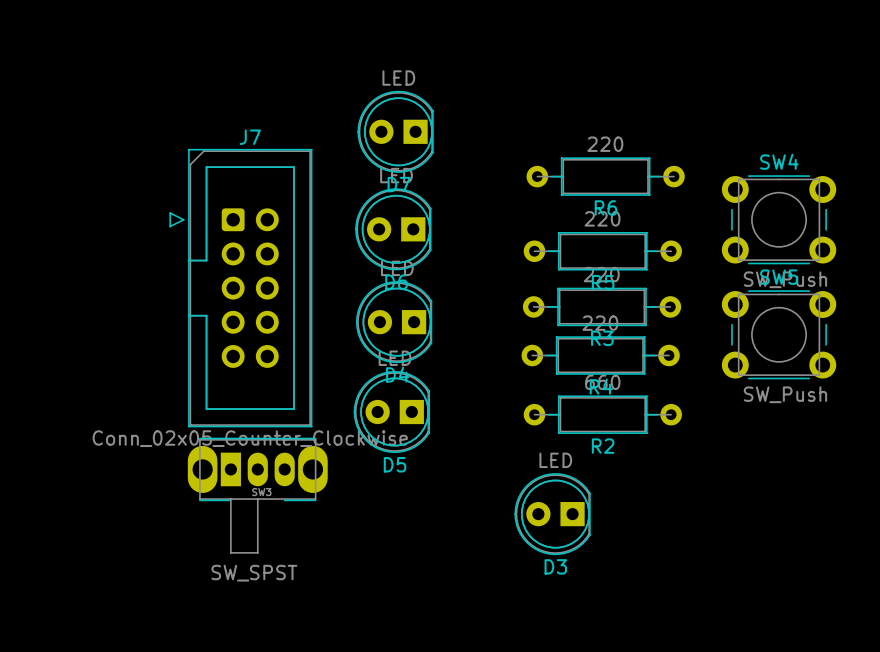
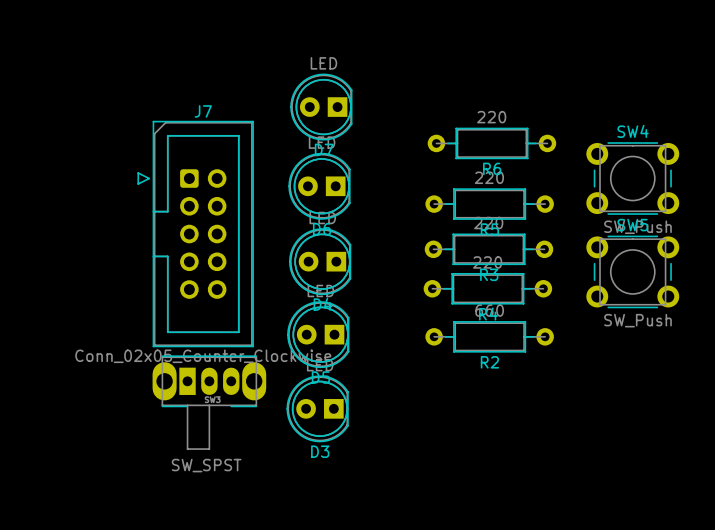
D3 position: (552, 514) -> (317, 408)

